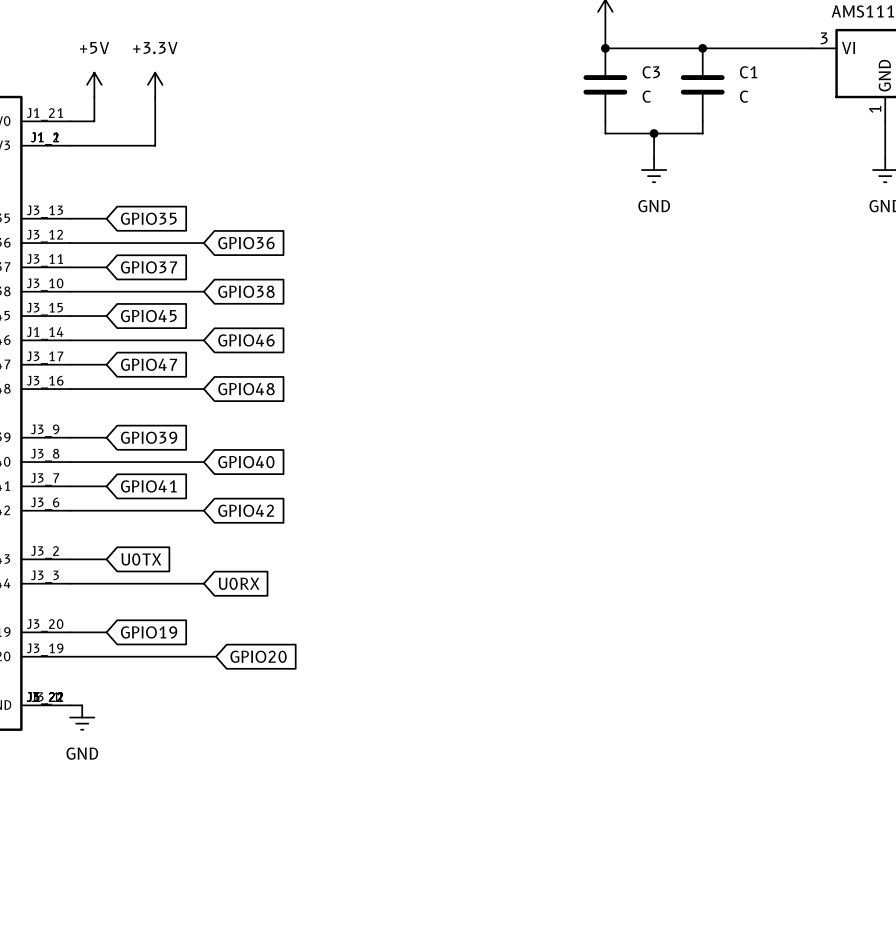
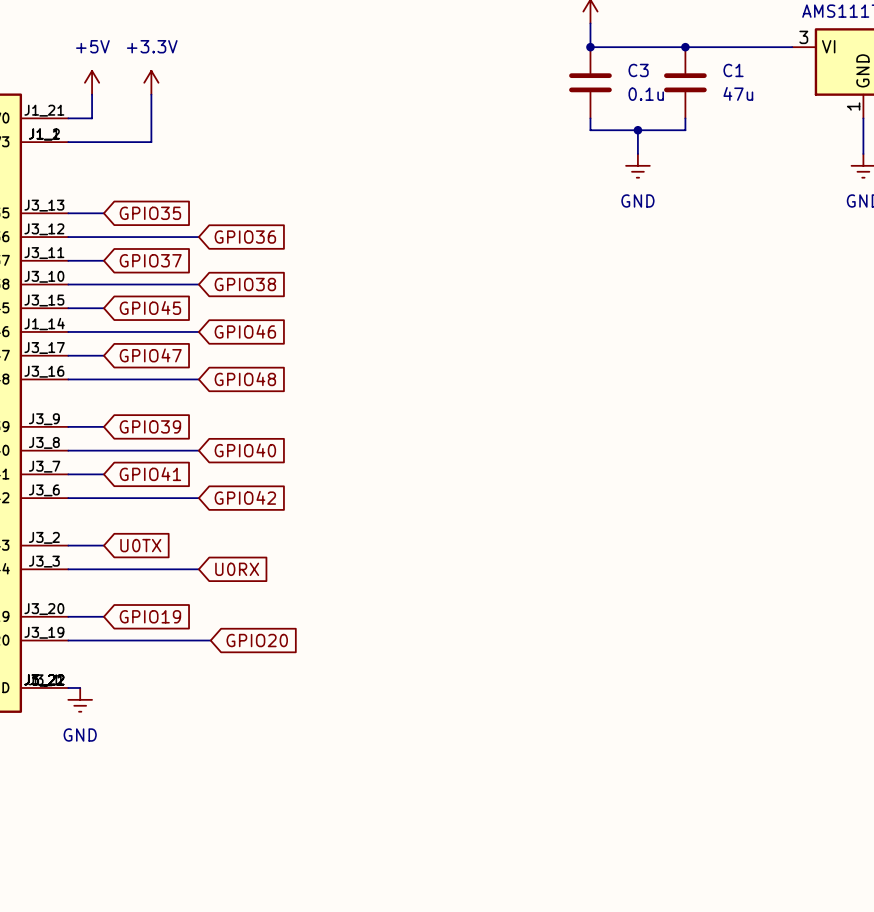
C3 value: C (646, 96) -> 0.1u (646, 94)
C1 value: C (744, 96) -> 47u (738, 93)

